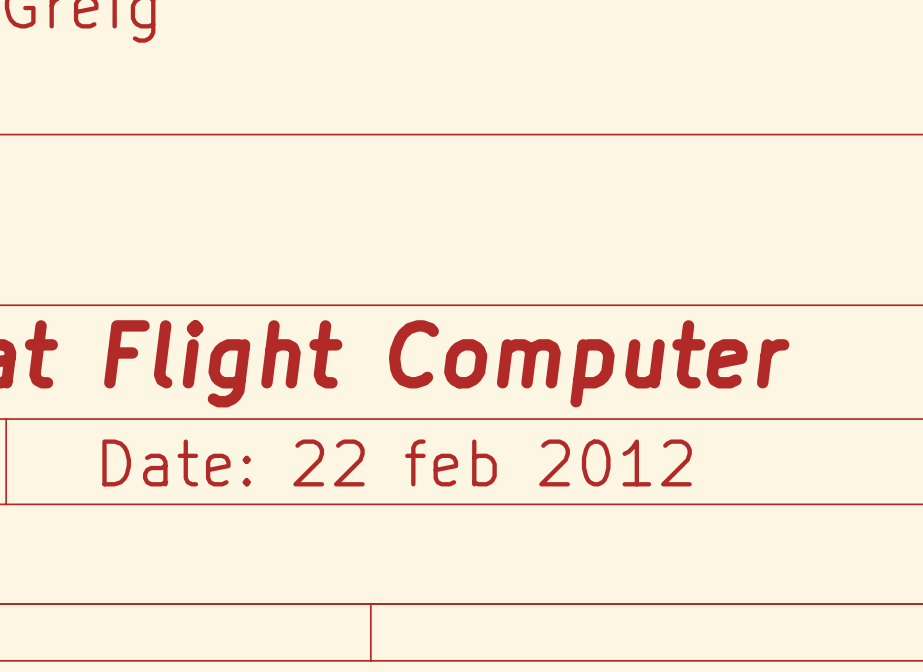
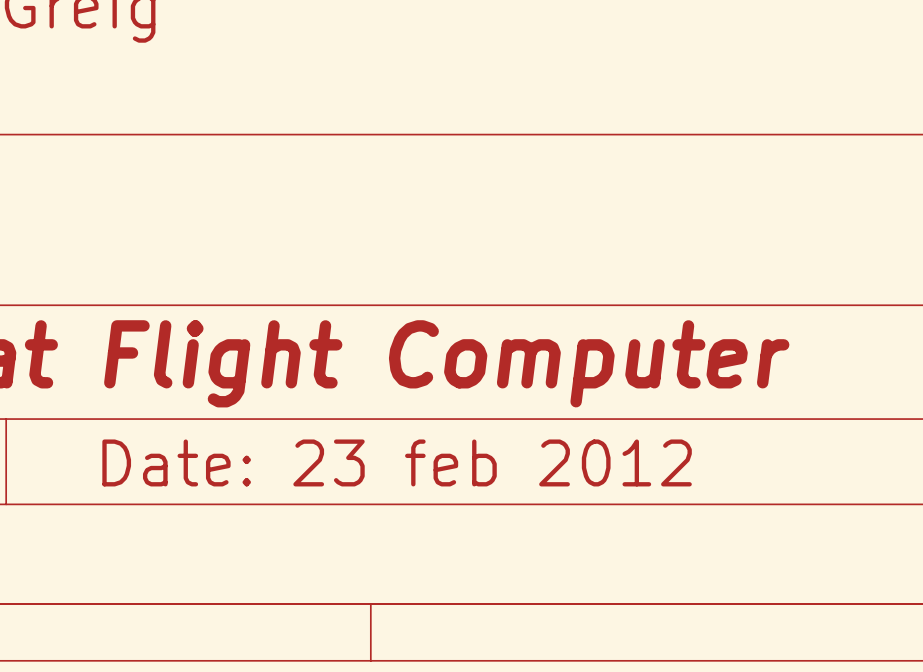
title block: Date: 22 feb 2012 (397, 462) -> Date: 23 feb 2012 (397, 462)

